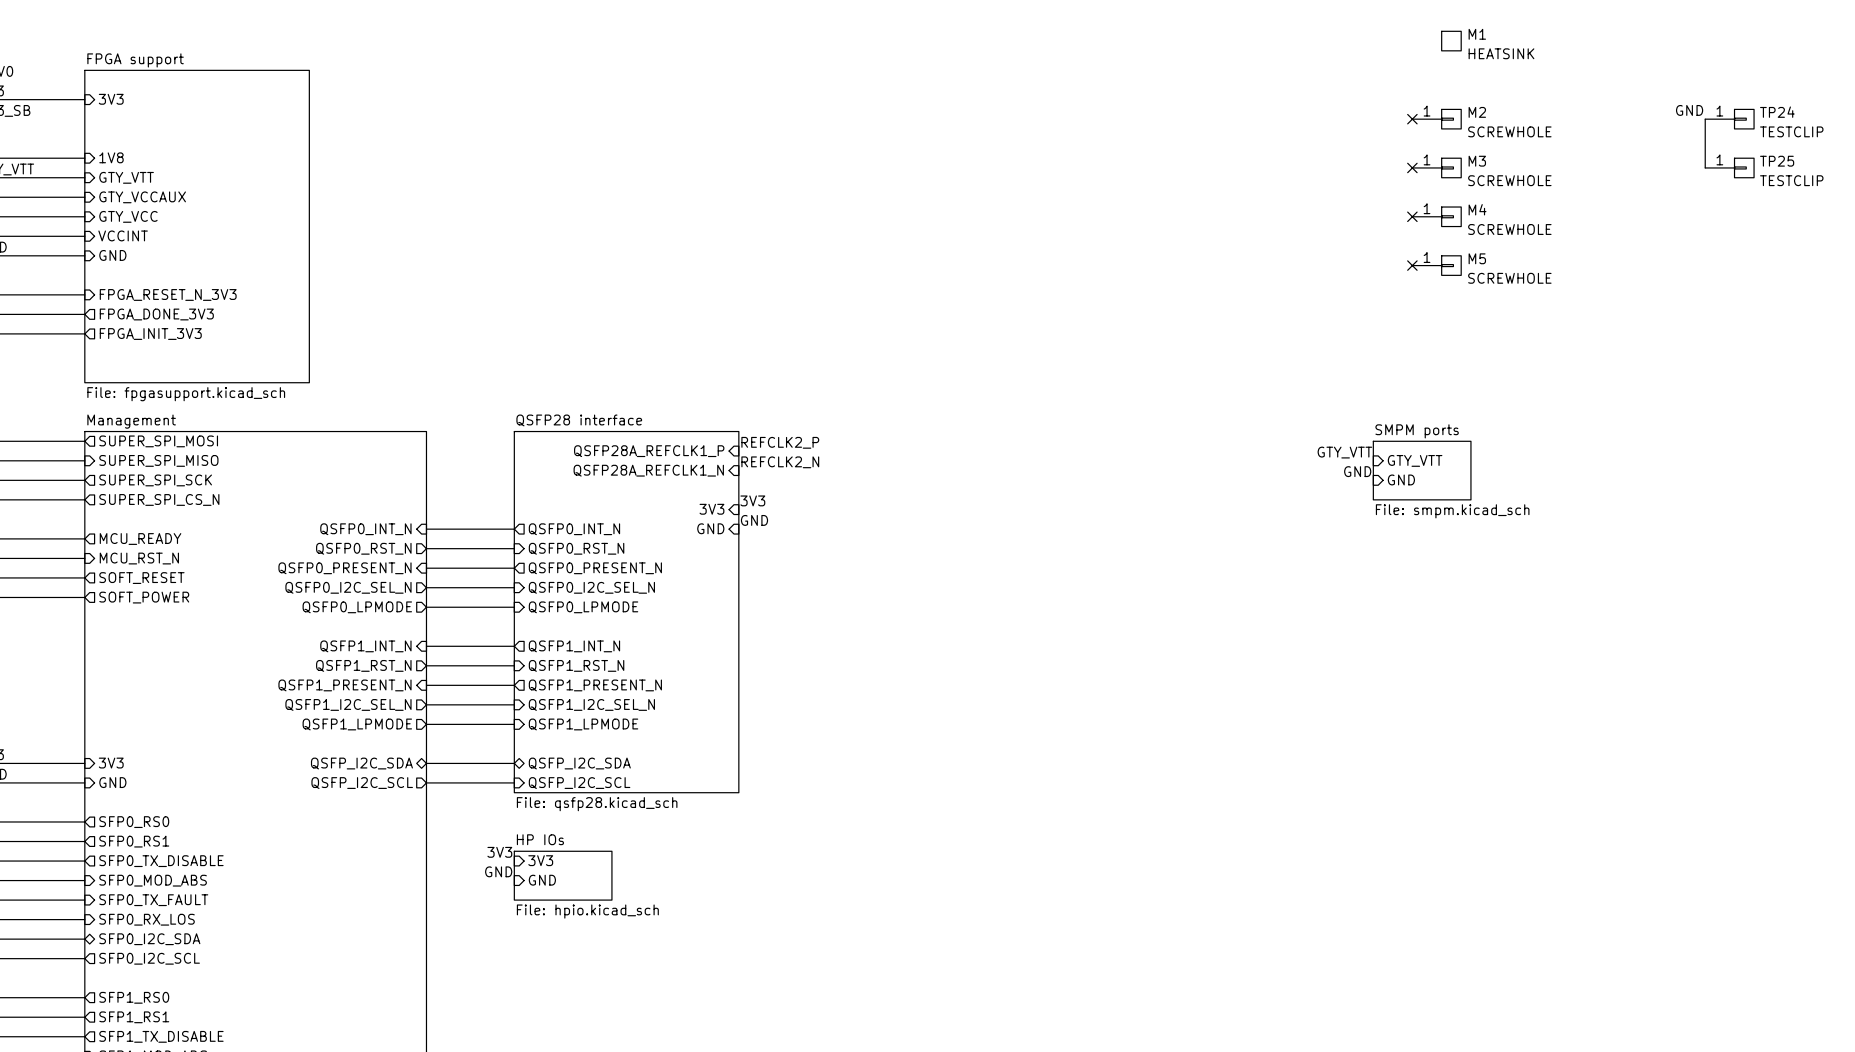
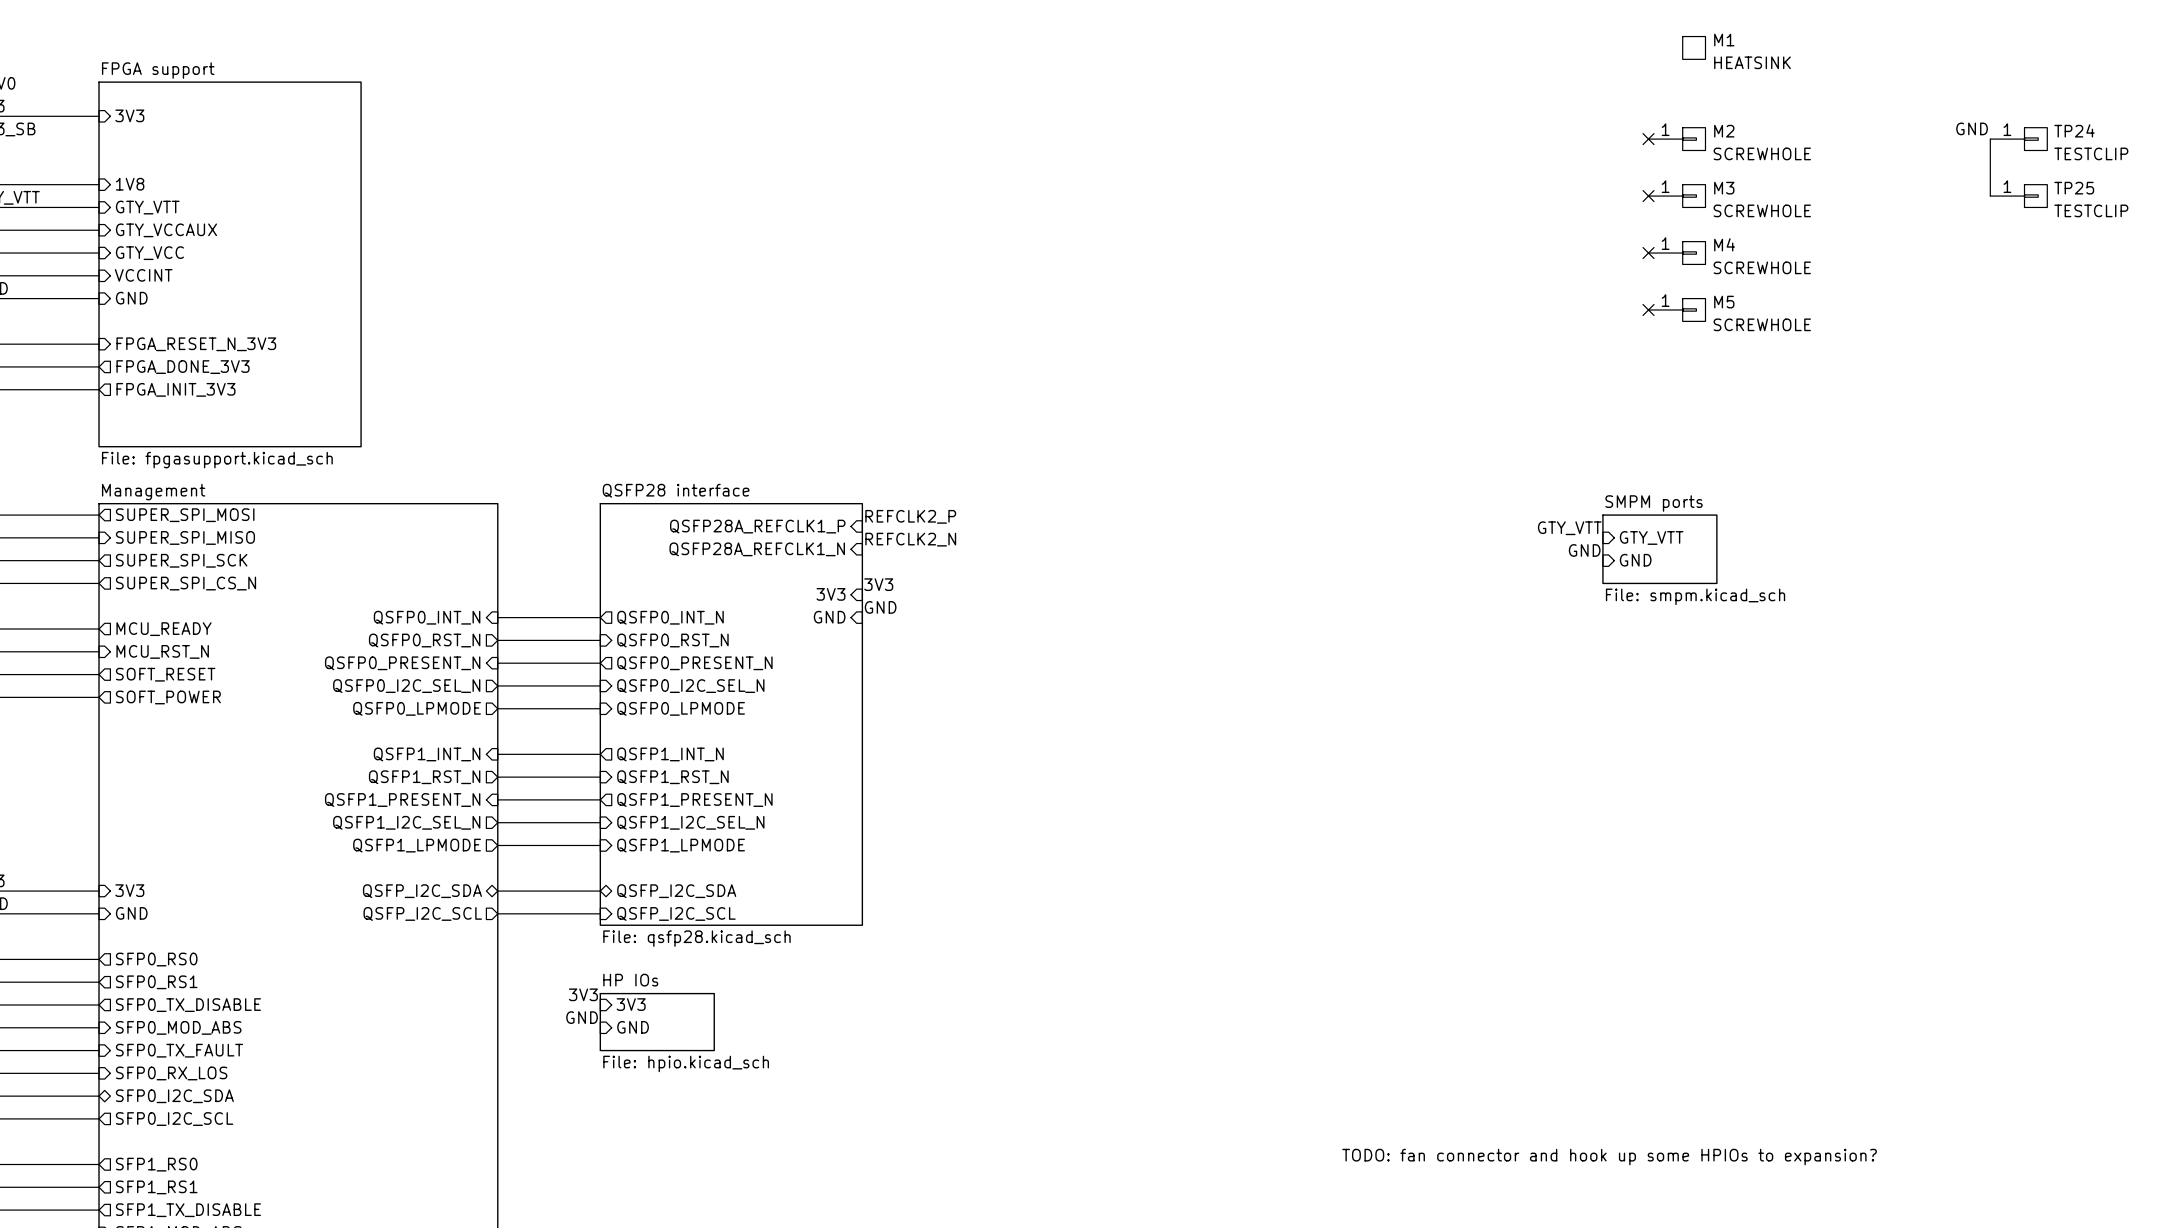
text: none -> TODO: fan connector and hook up some HPIOs to expansion? (1609, 1157)

